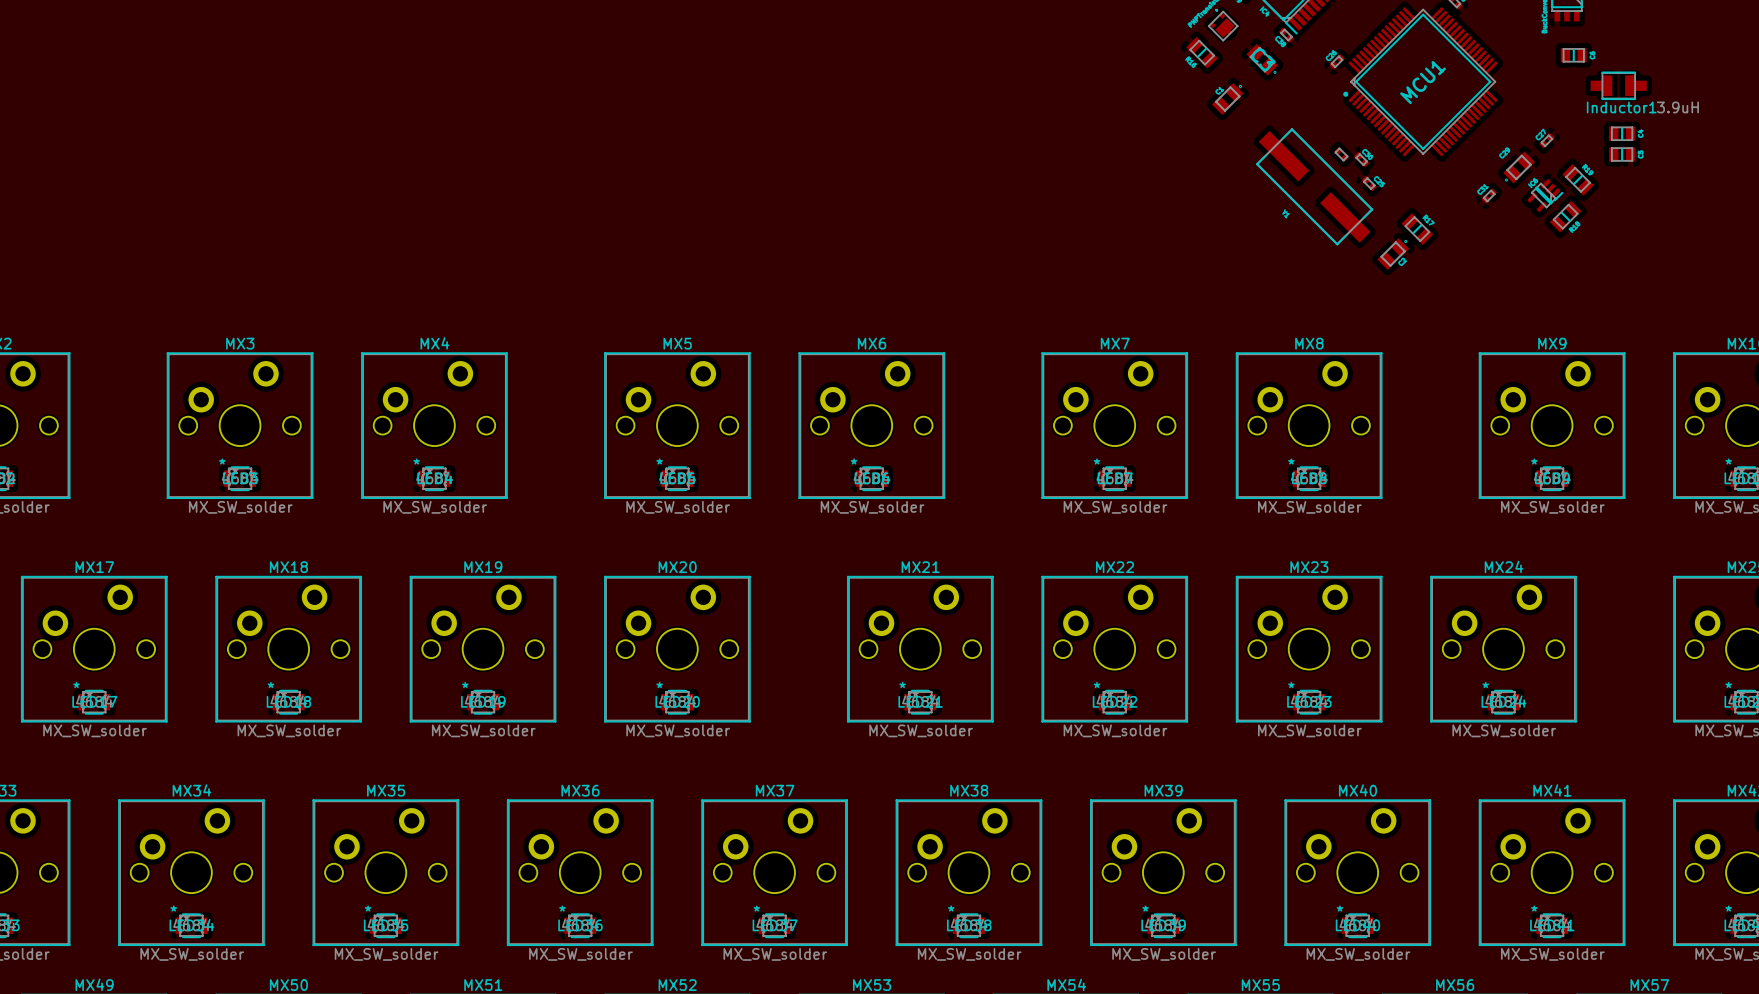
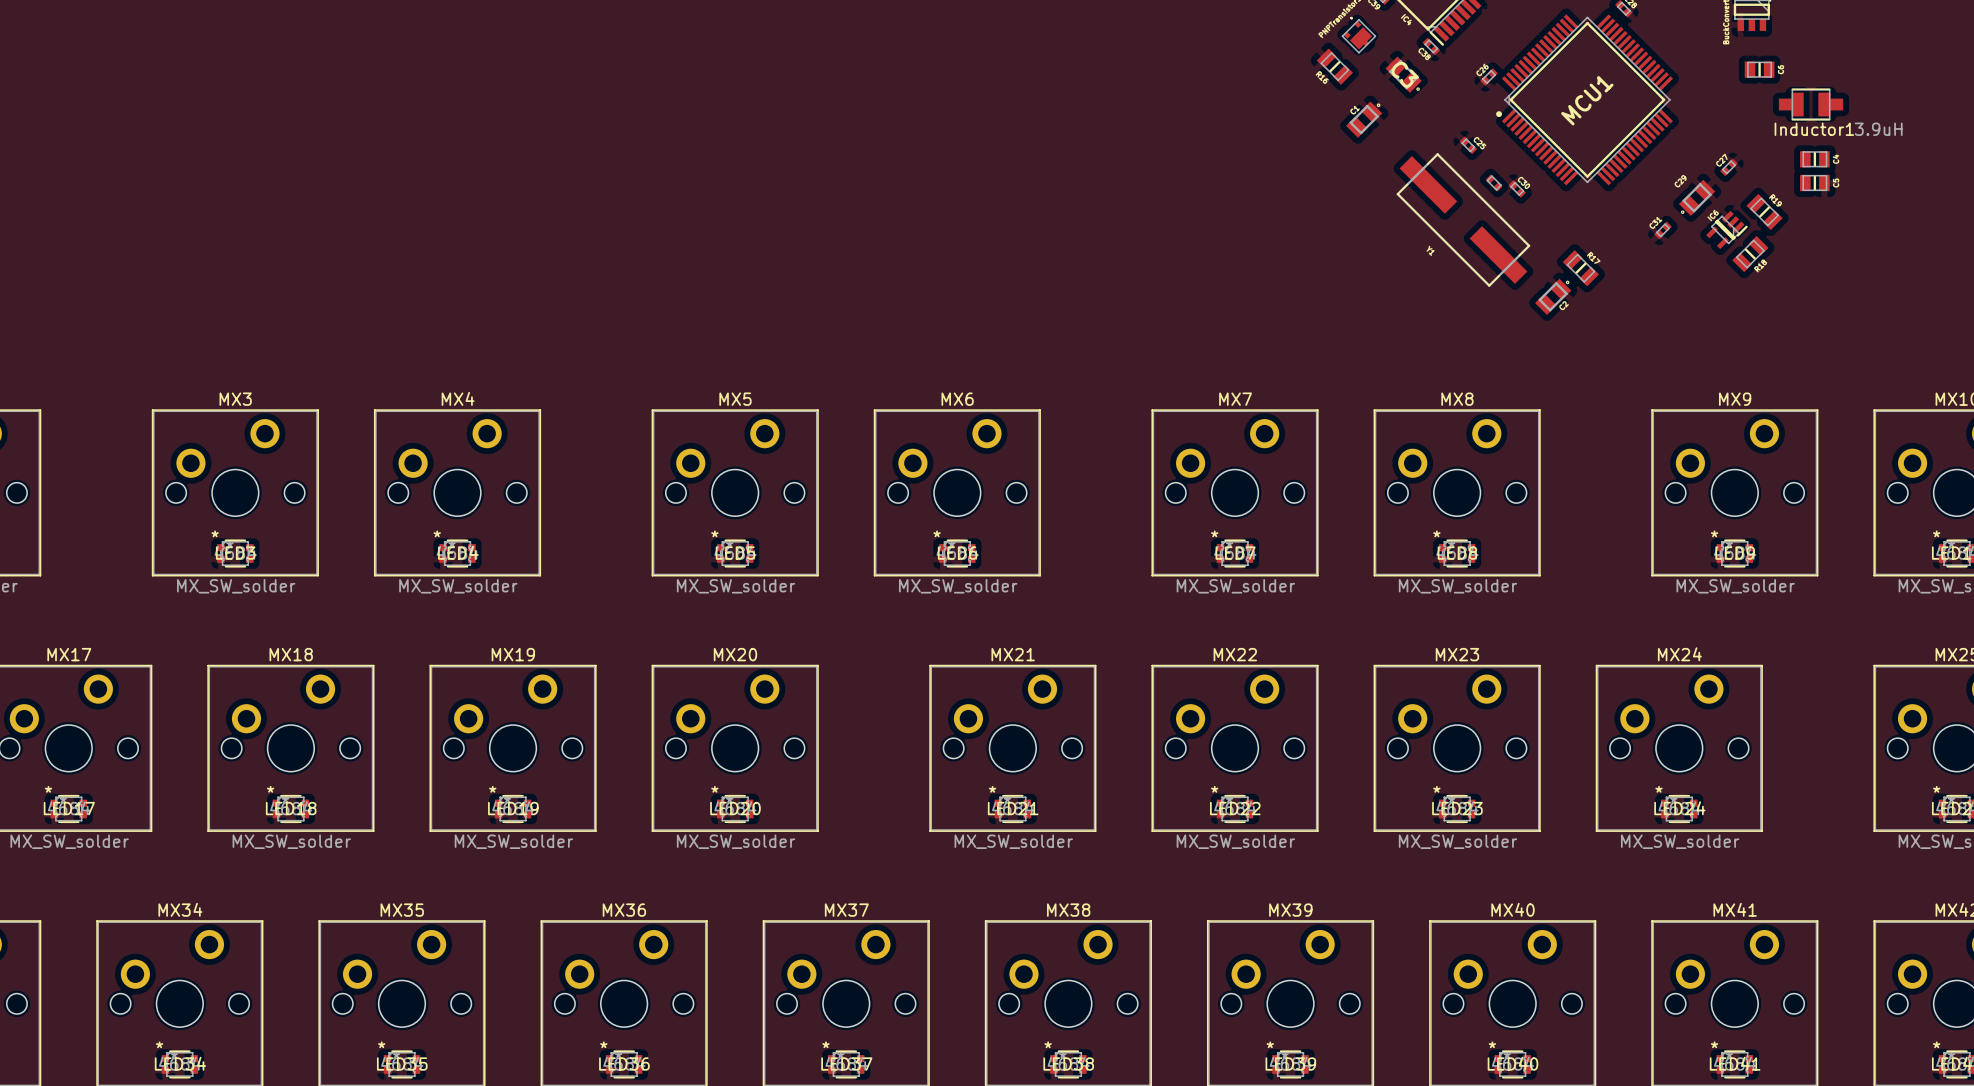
part position: (1369, 183) -> (1468, 145)

